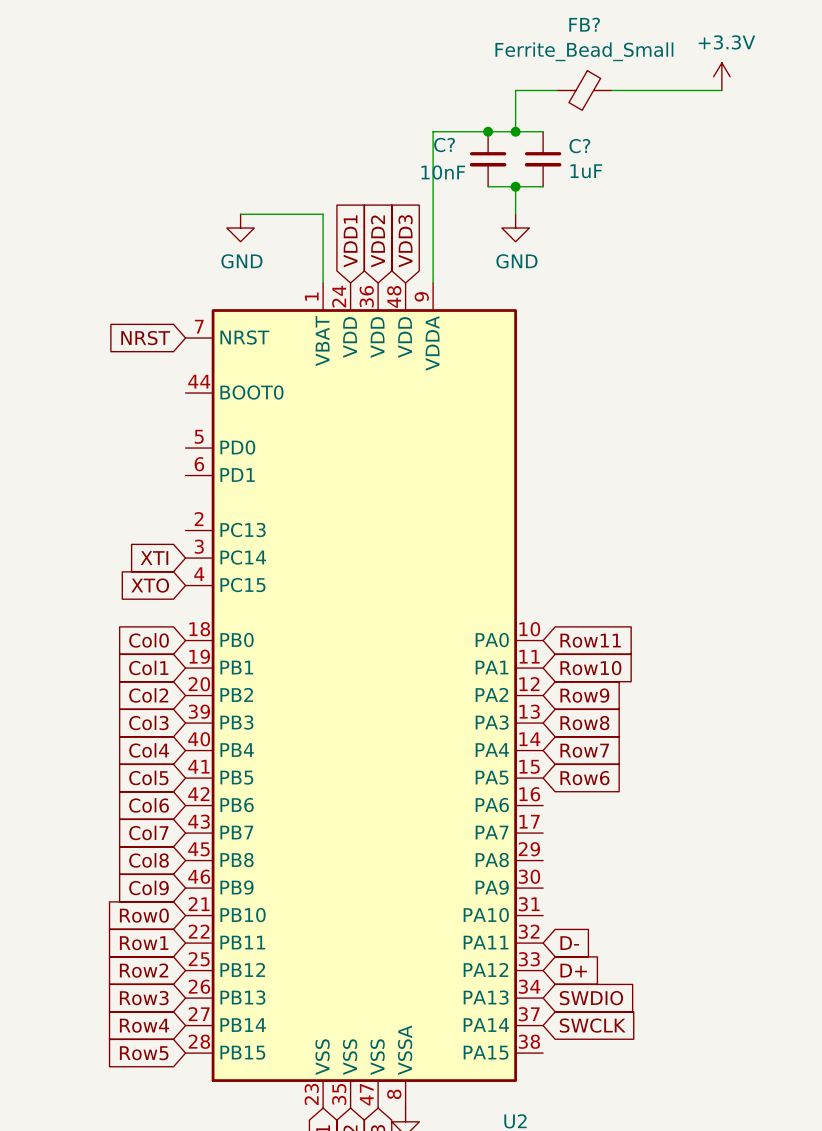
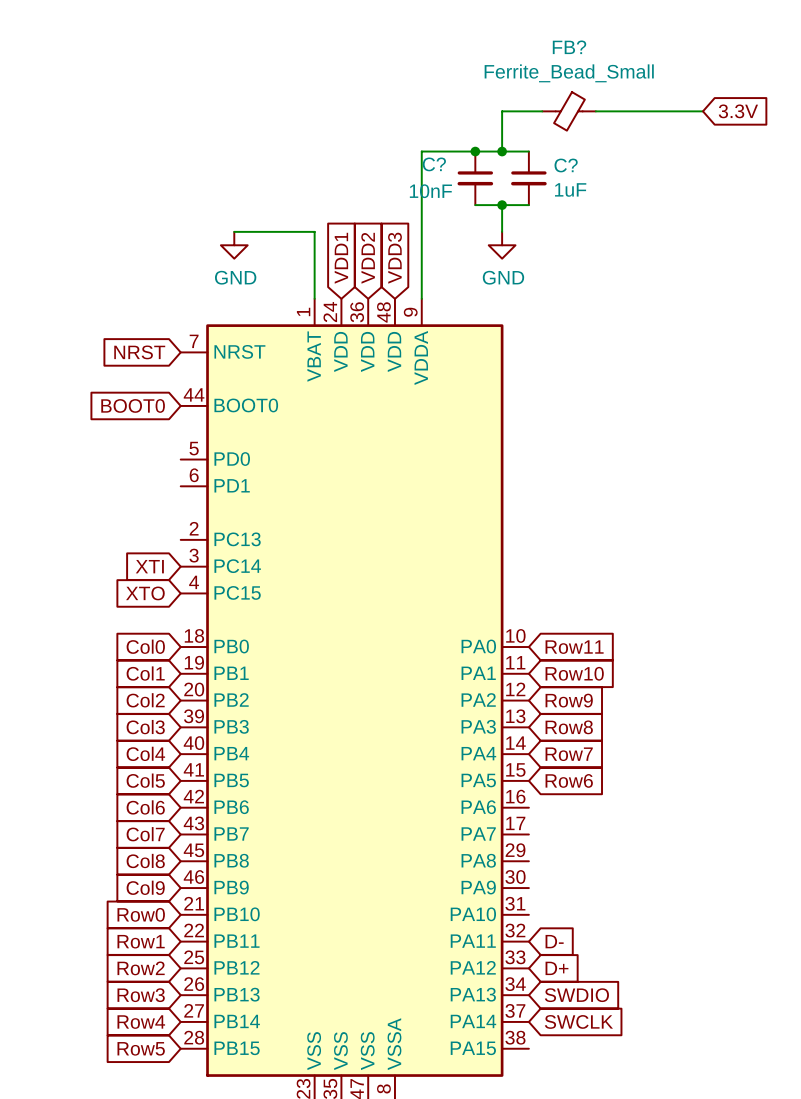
power symbol: +3.3V (721, 76) -> none
global label: none -> 3.3V (738, 111)
global label: none -> BOOT0 (133, 405)

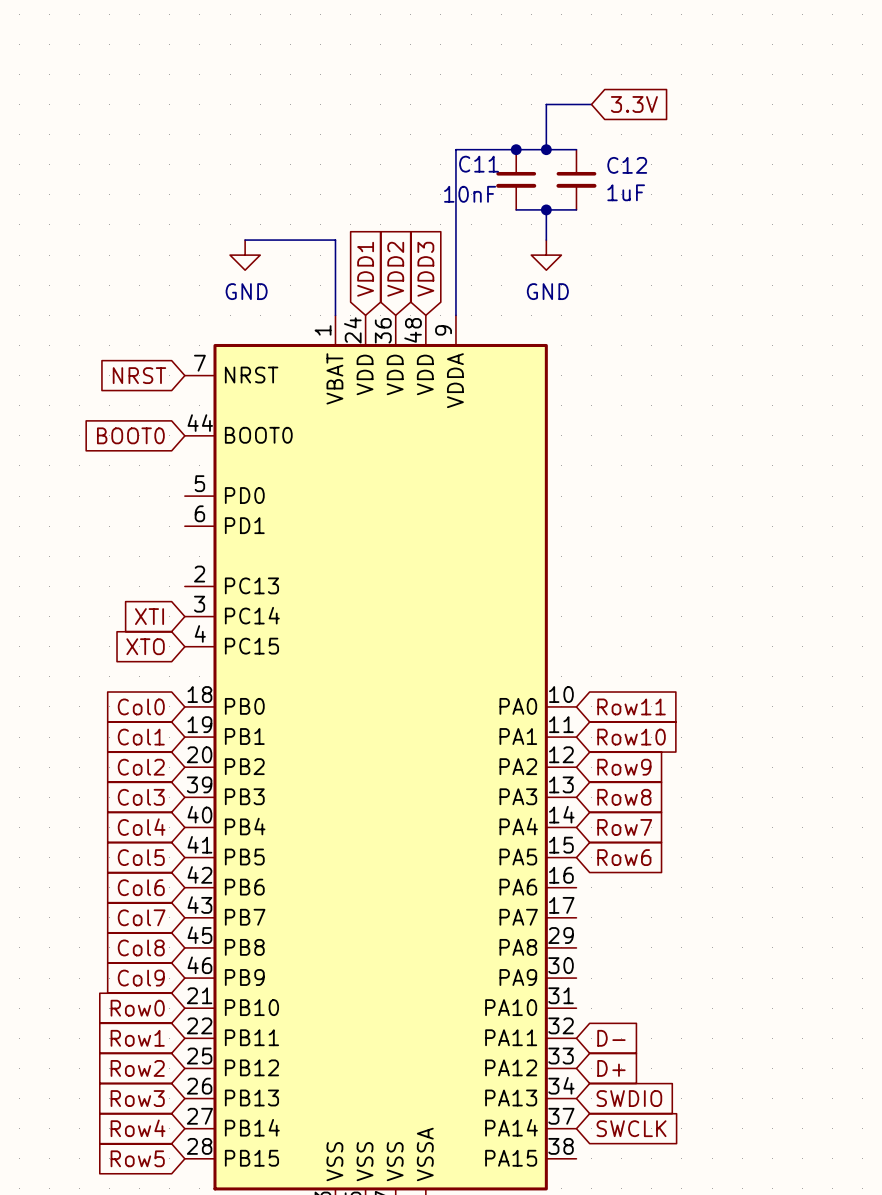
FB?: Ferrite_Bead_Small (569, 111) -> none
wire: (595, 111) (702, 111) -> none
global label position: 3.3V (738, 111) -> 3.3V (634, 104)
C? name: C? (434, 164) -> C11 (479, 164)
C? name: C? (566, 165) -> C12 (627, 165)

